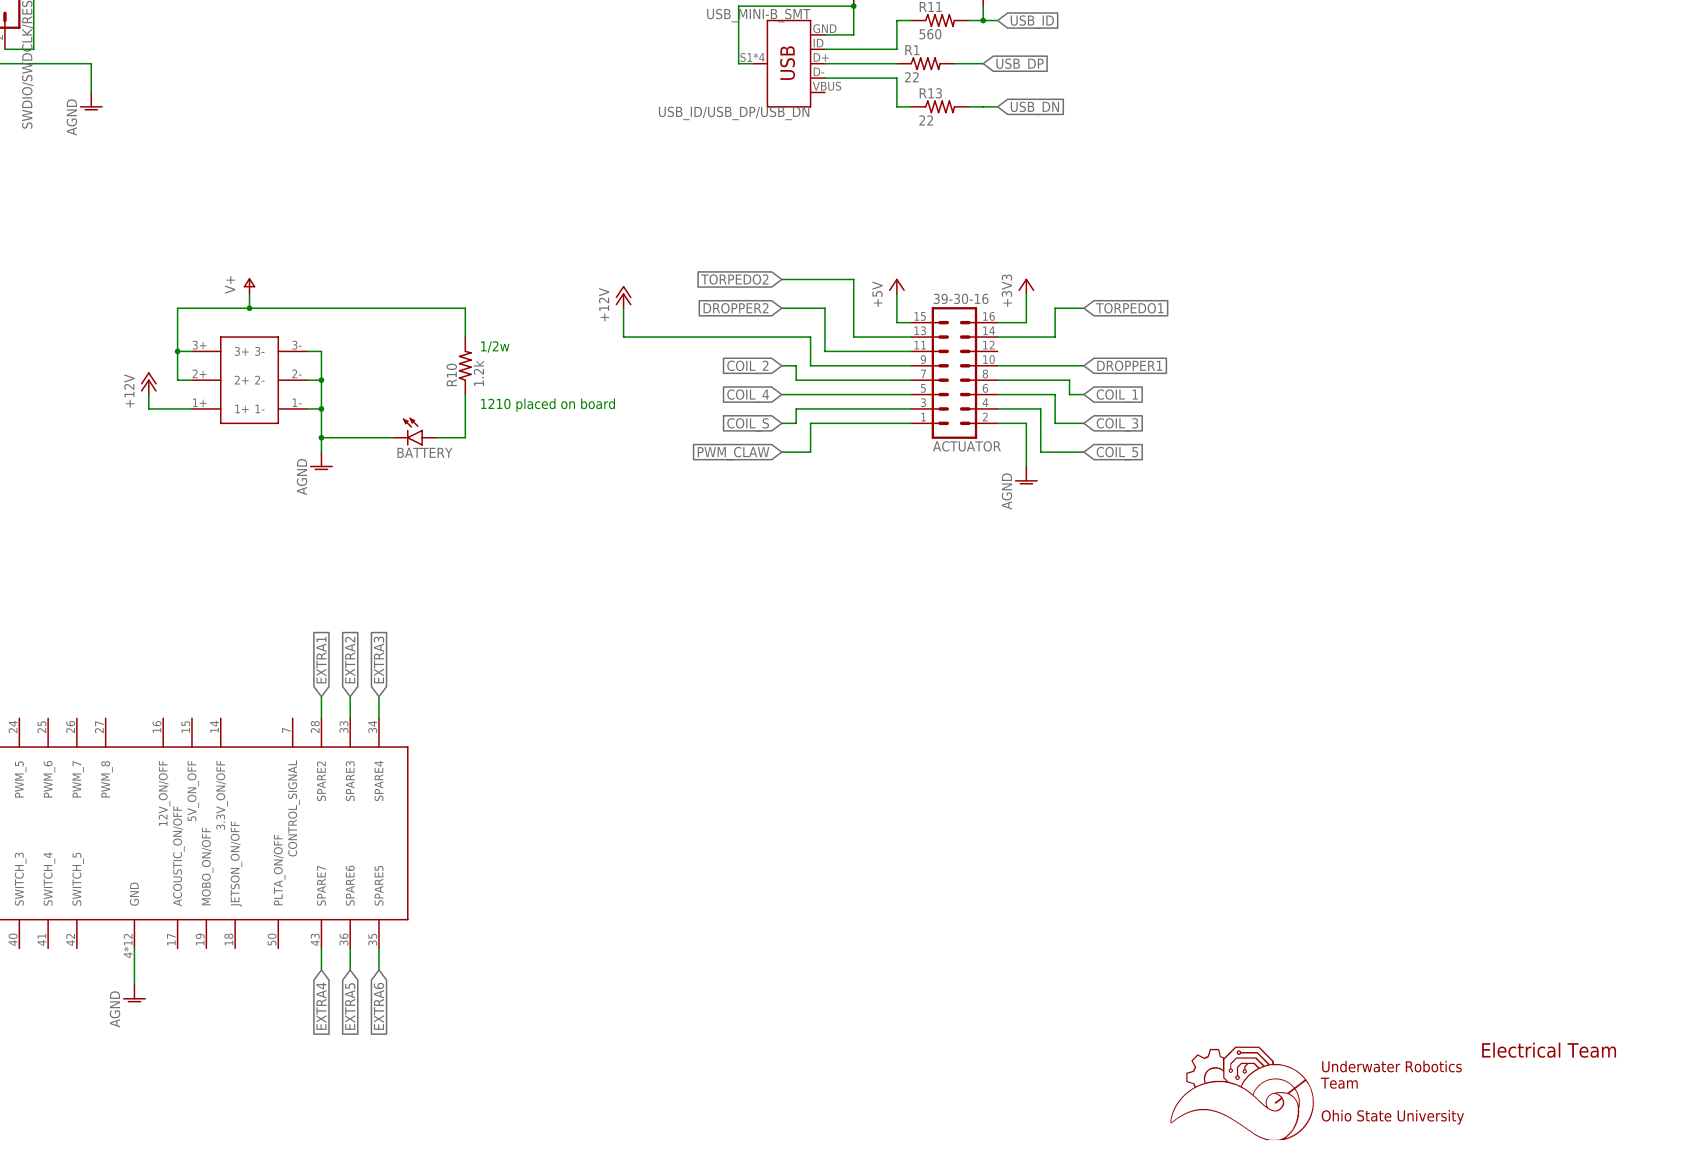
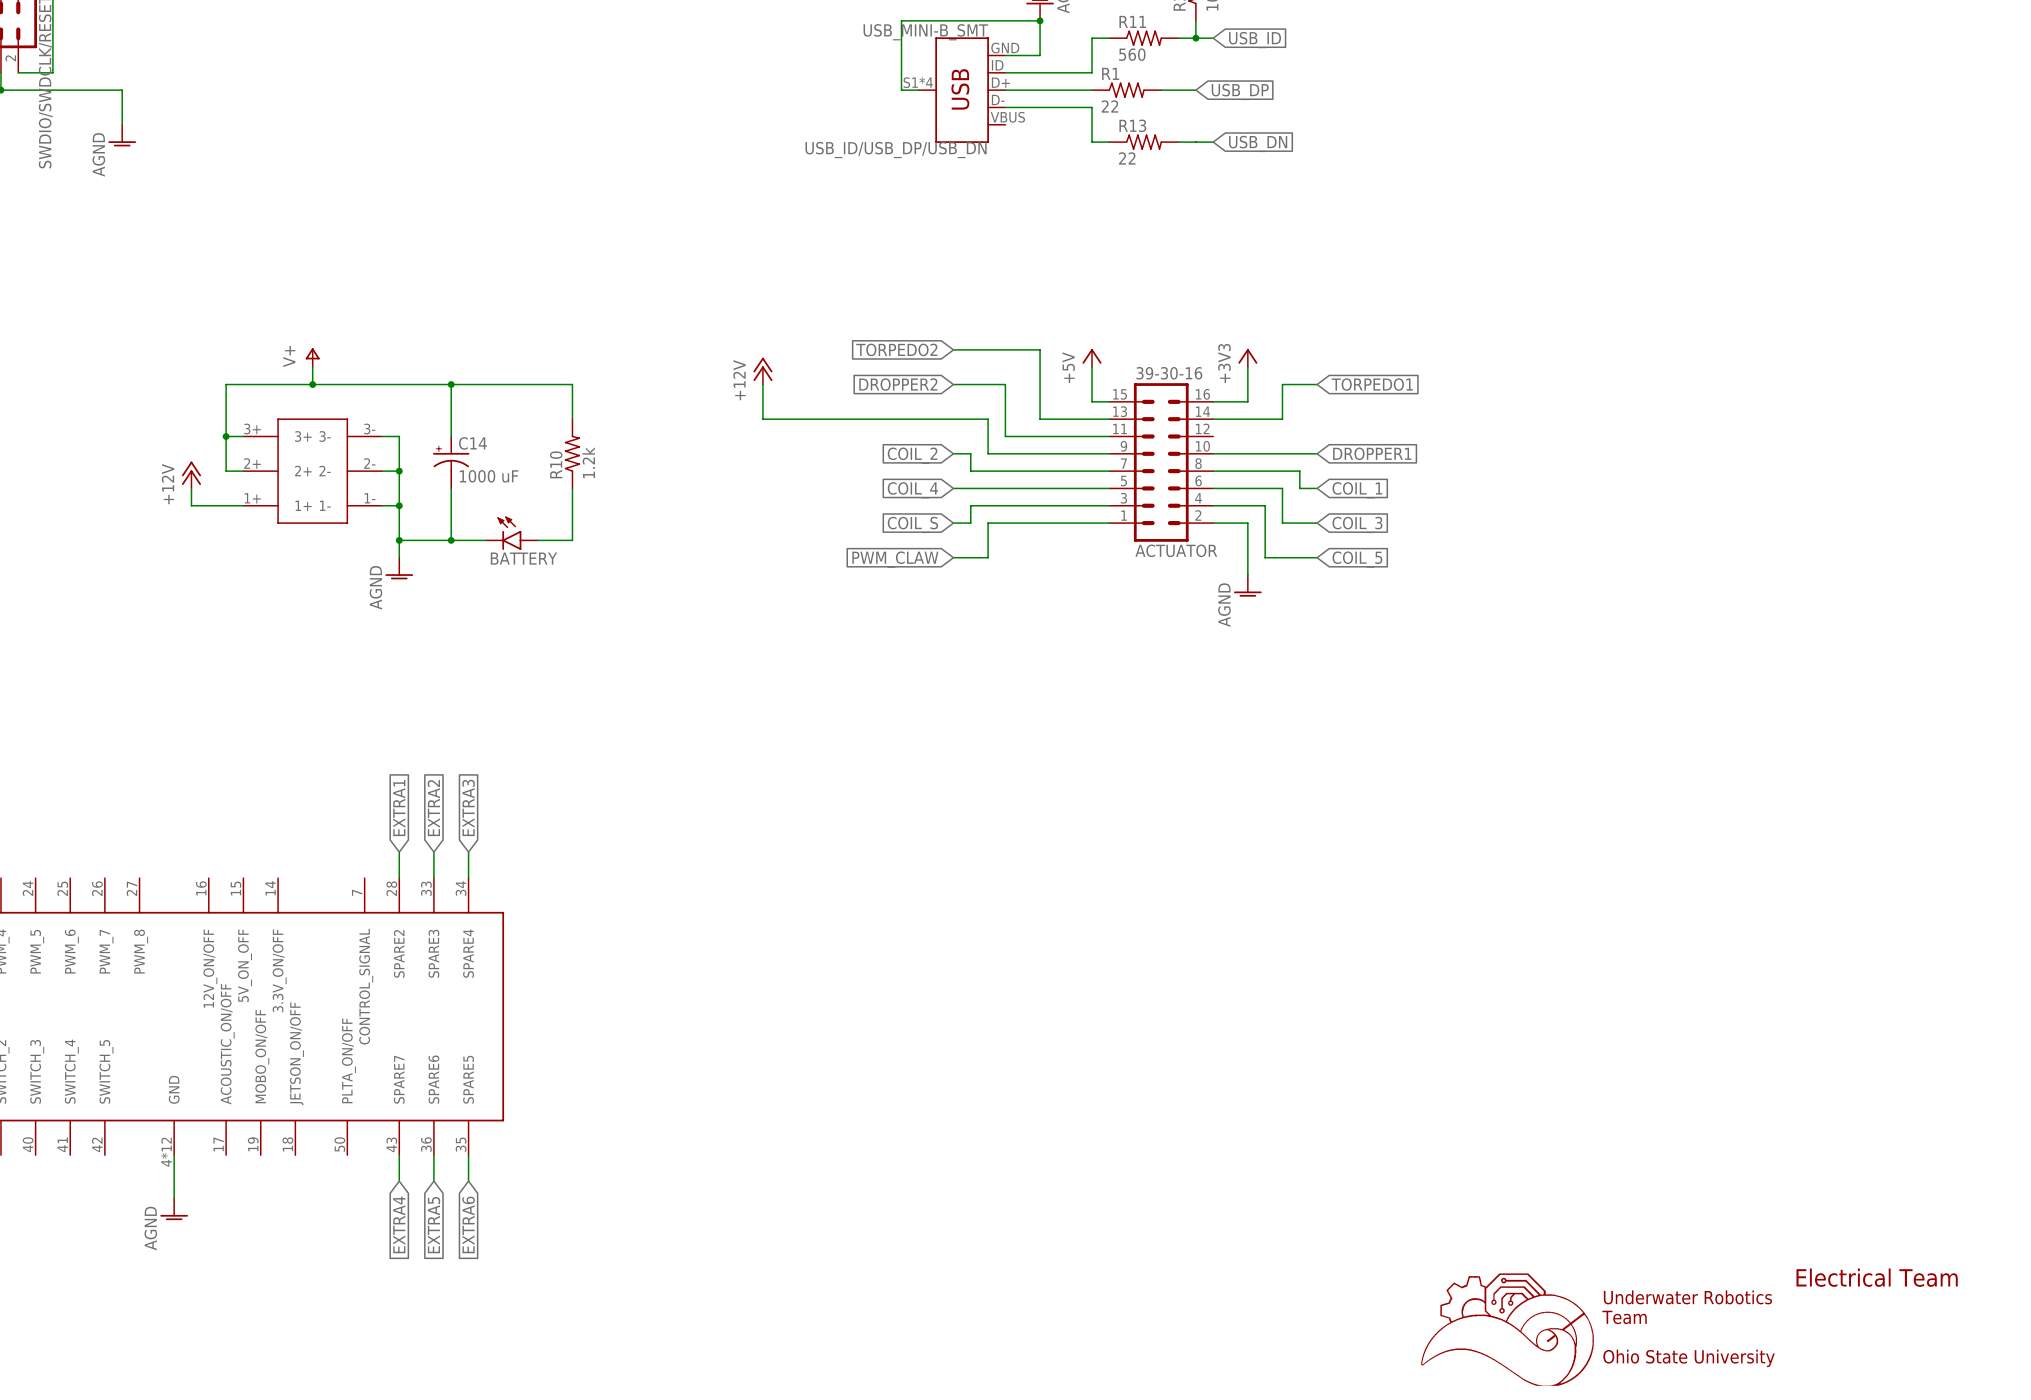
wire: none -> (451, 384) (451, 436)
junction: none -> (451, 384)
text: 1/2w (495, 346) -> none
C14: none -> 1000 uF (451, 462)
wire: none -> (451, 488) (451, 540)
text: 1210 placed on board (548, 405) -> none
junction: none -> (451, 540)

